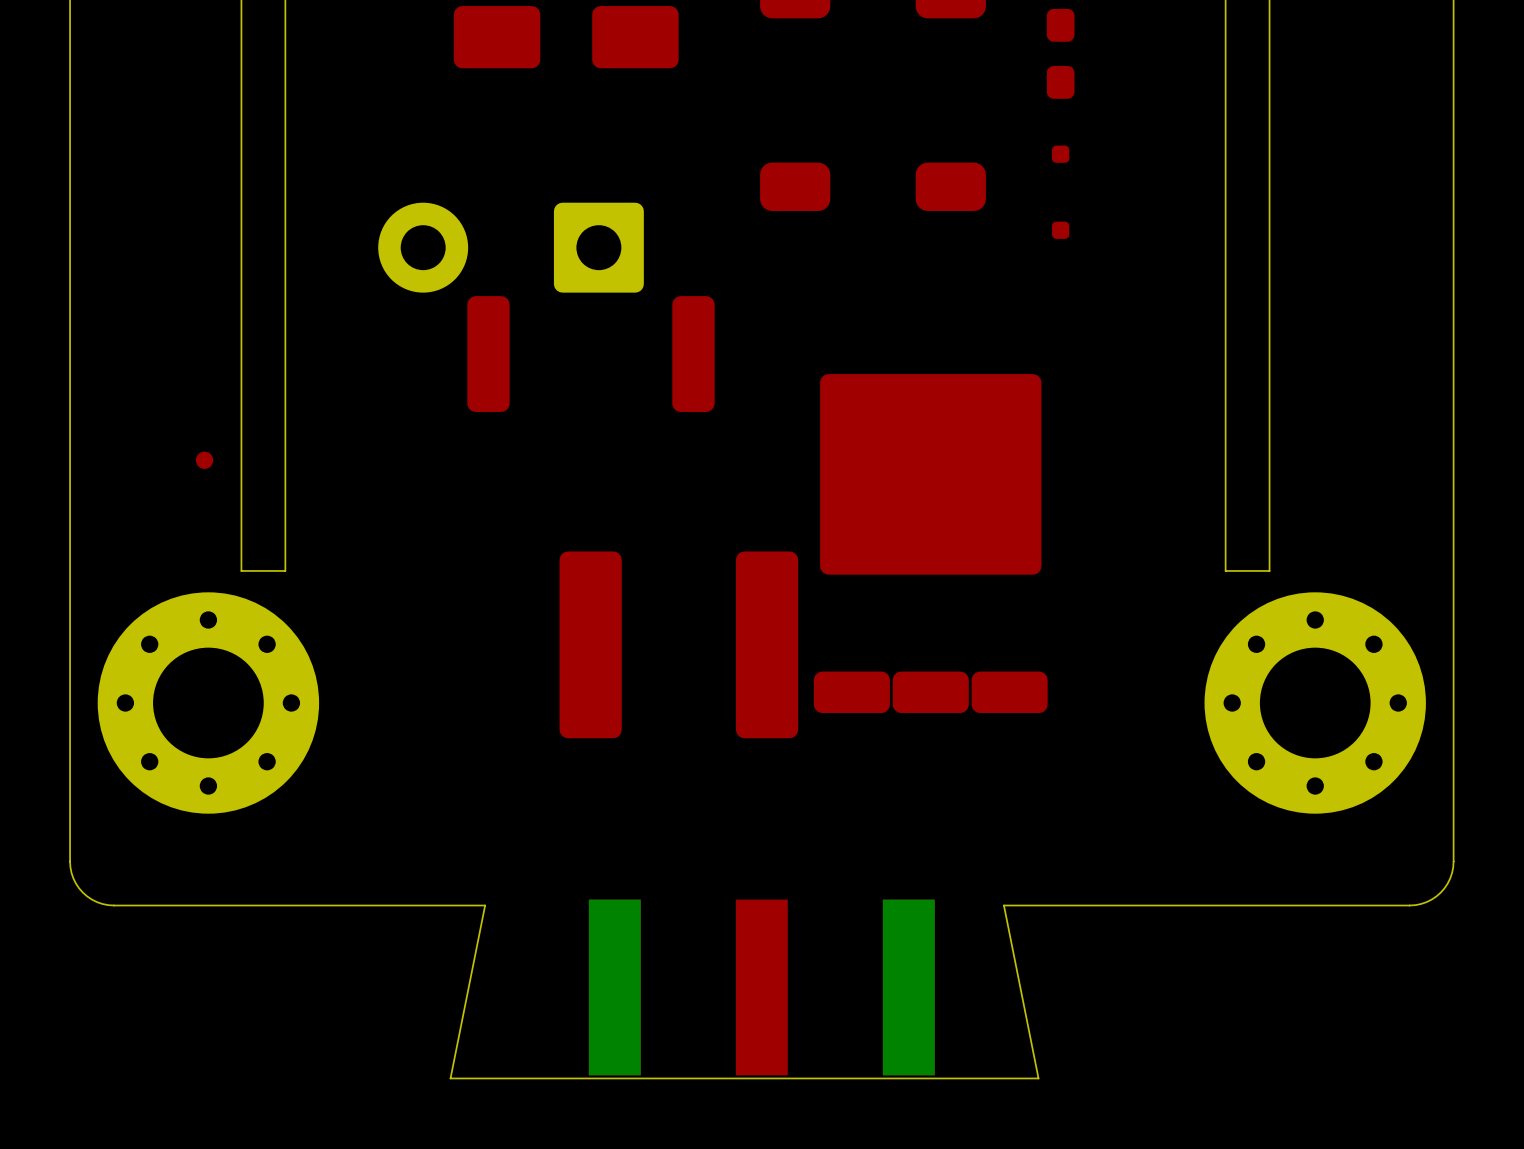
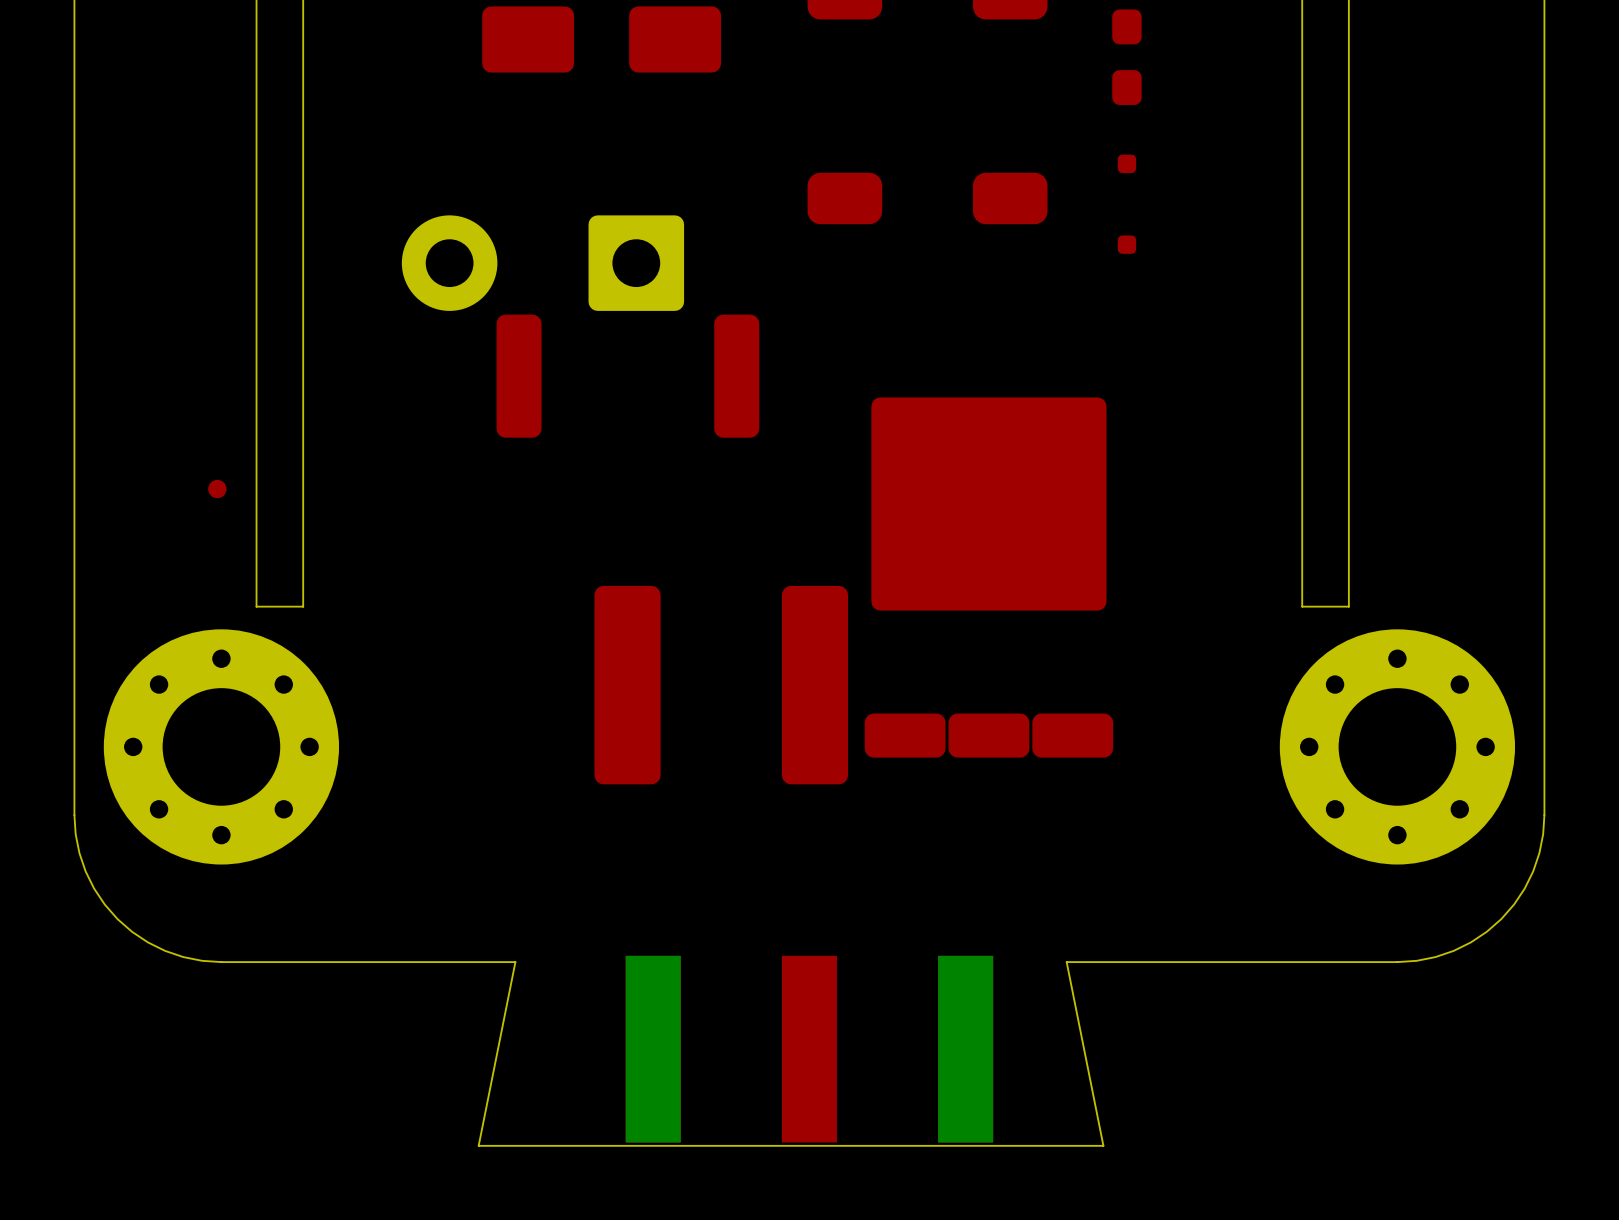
board edge: (70, 767) (70, 867) (75, 883) (82, 892) (92, 899) (108, 905) (208, 905) -> (74, 815) (75, 834) (85, 871) (104, 904) (117, 919) (131, 931) (165, 950) (183, 957) (221, 962)
board edge: (1453, 767) (1453, 867) (1447, 883) (1440, 892) (1426, 902) (1415, 905) (1315, 905) -> (1544, 815) (1539, 853) (1533, 871) (1514, 904) (1501, 919) (1470, 942) (1453, 950) (1416, 960) (1397, 962)

